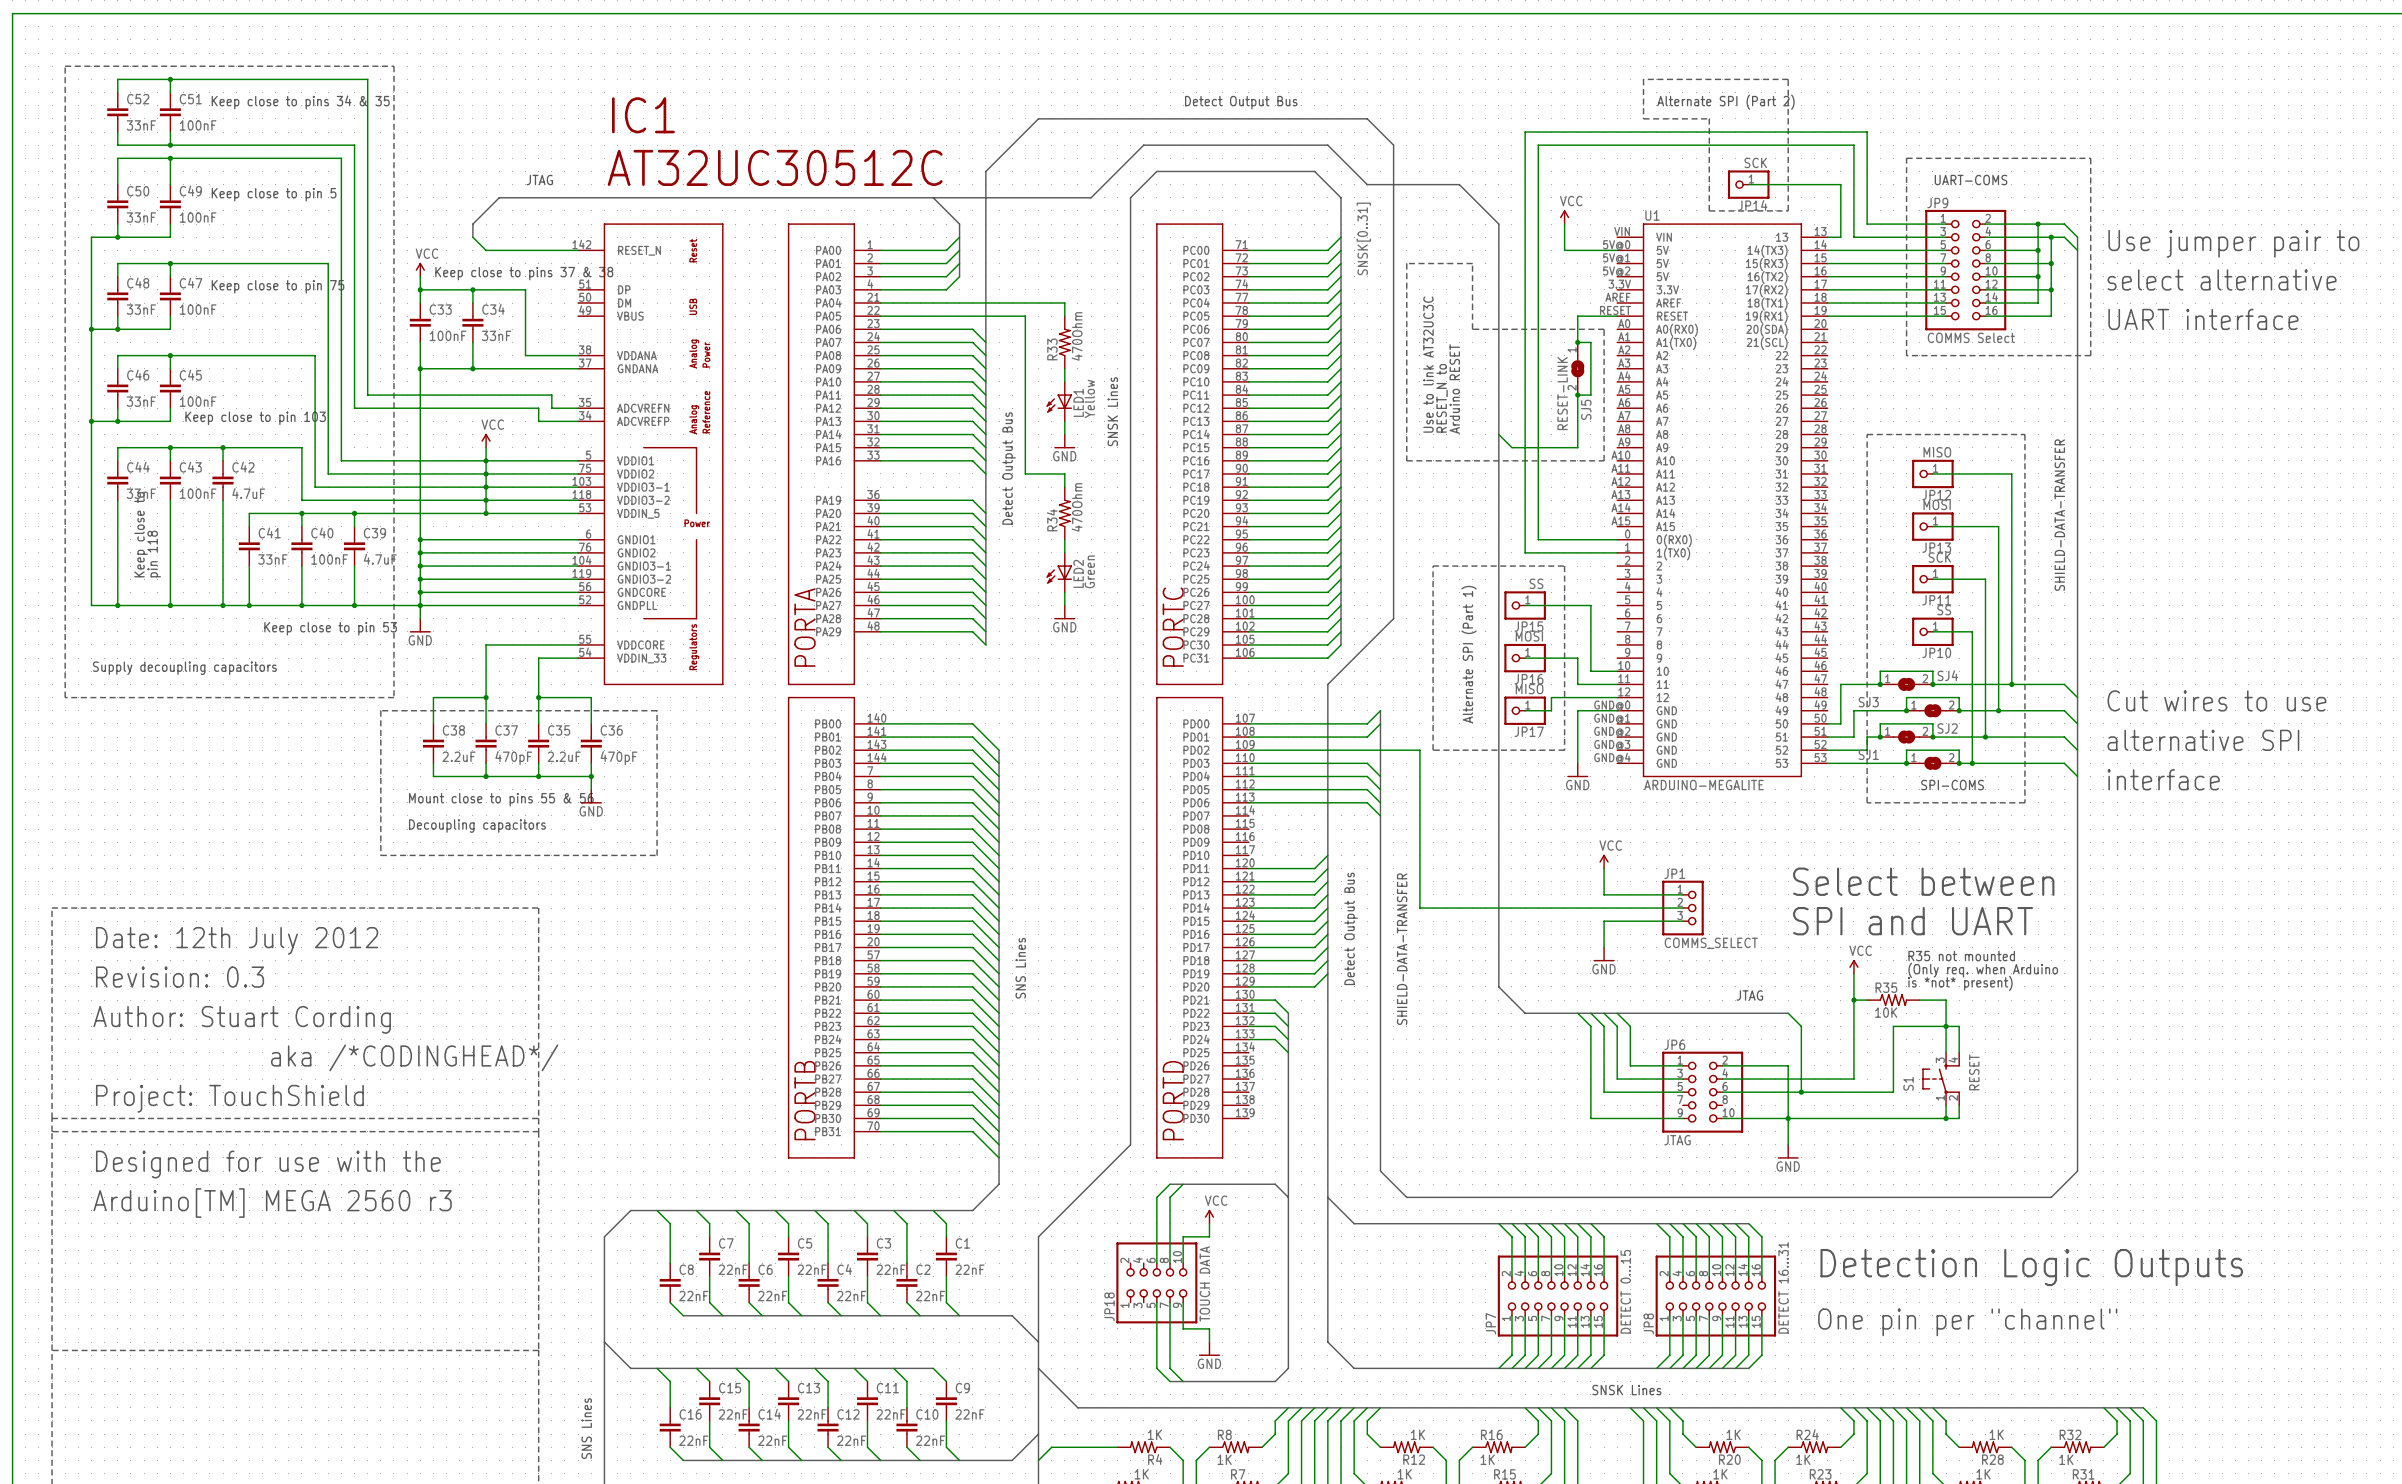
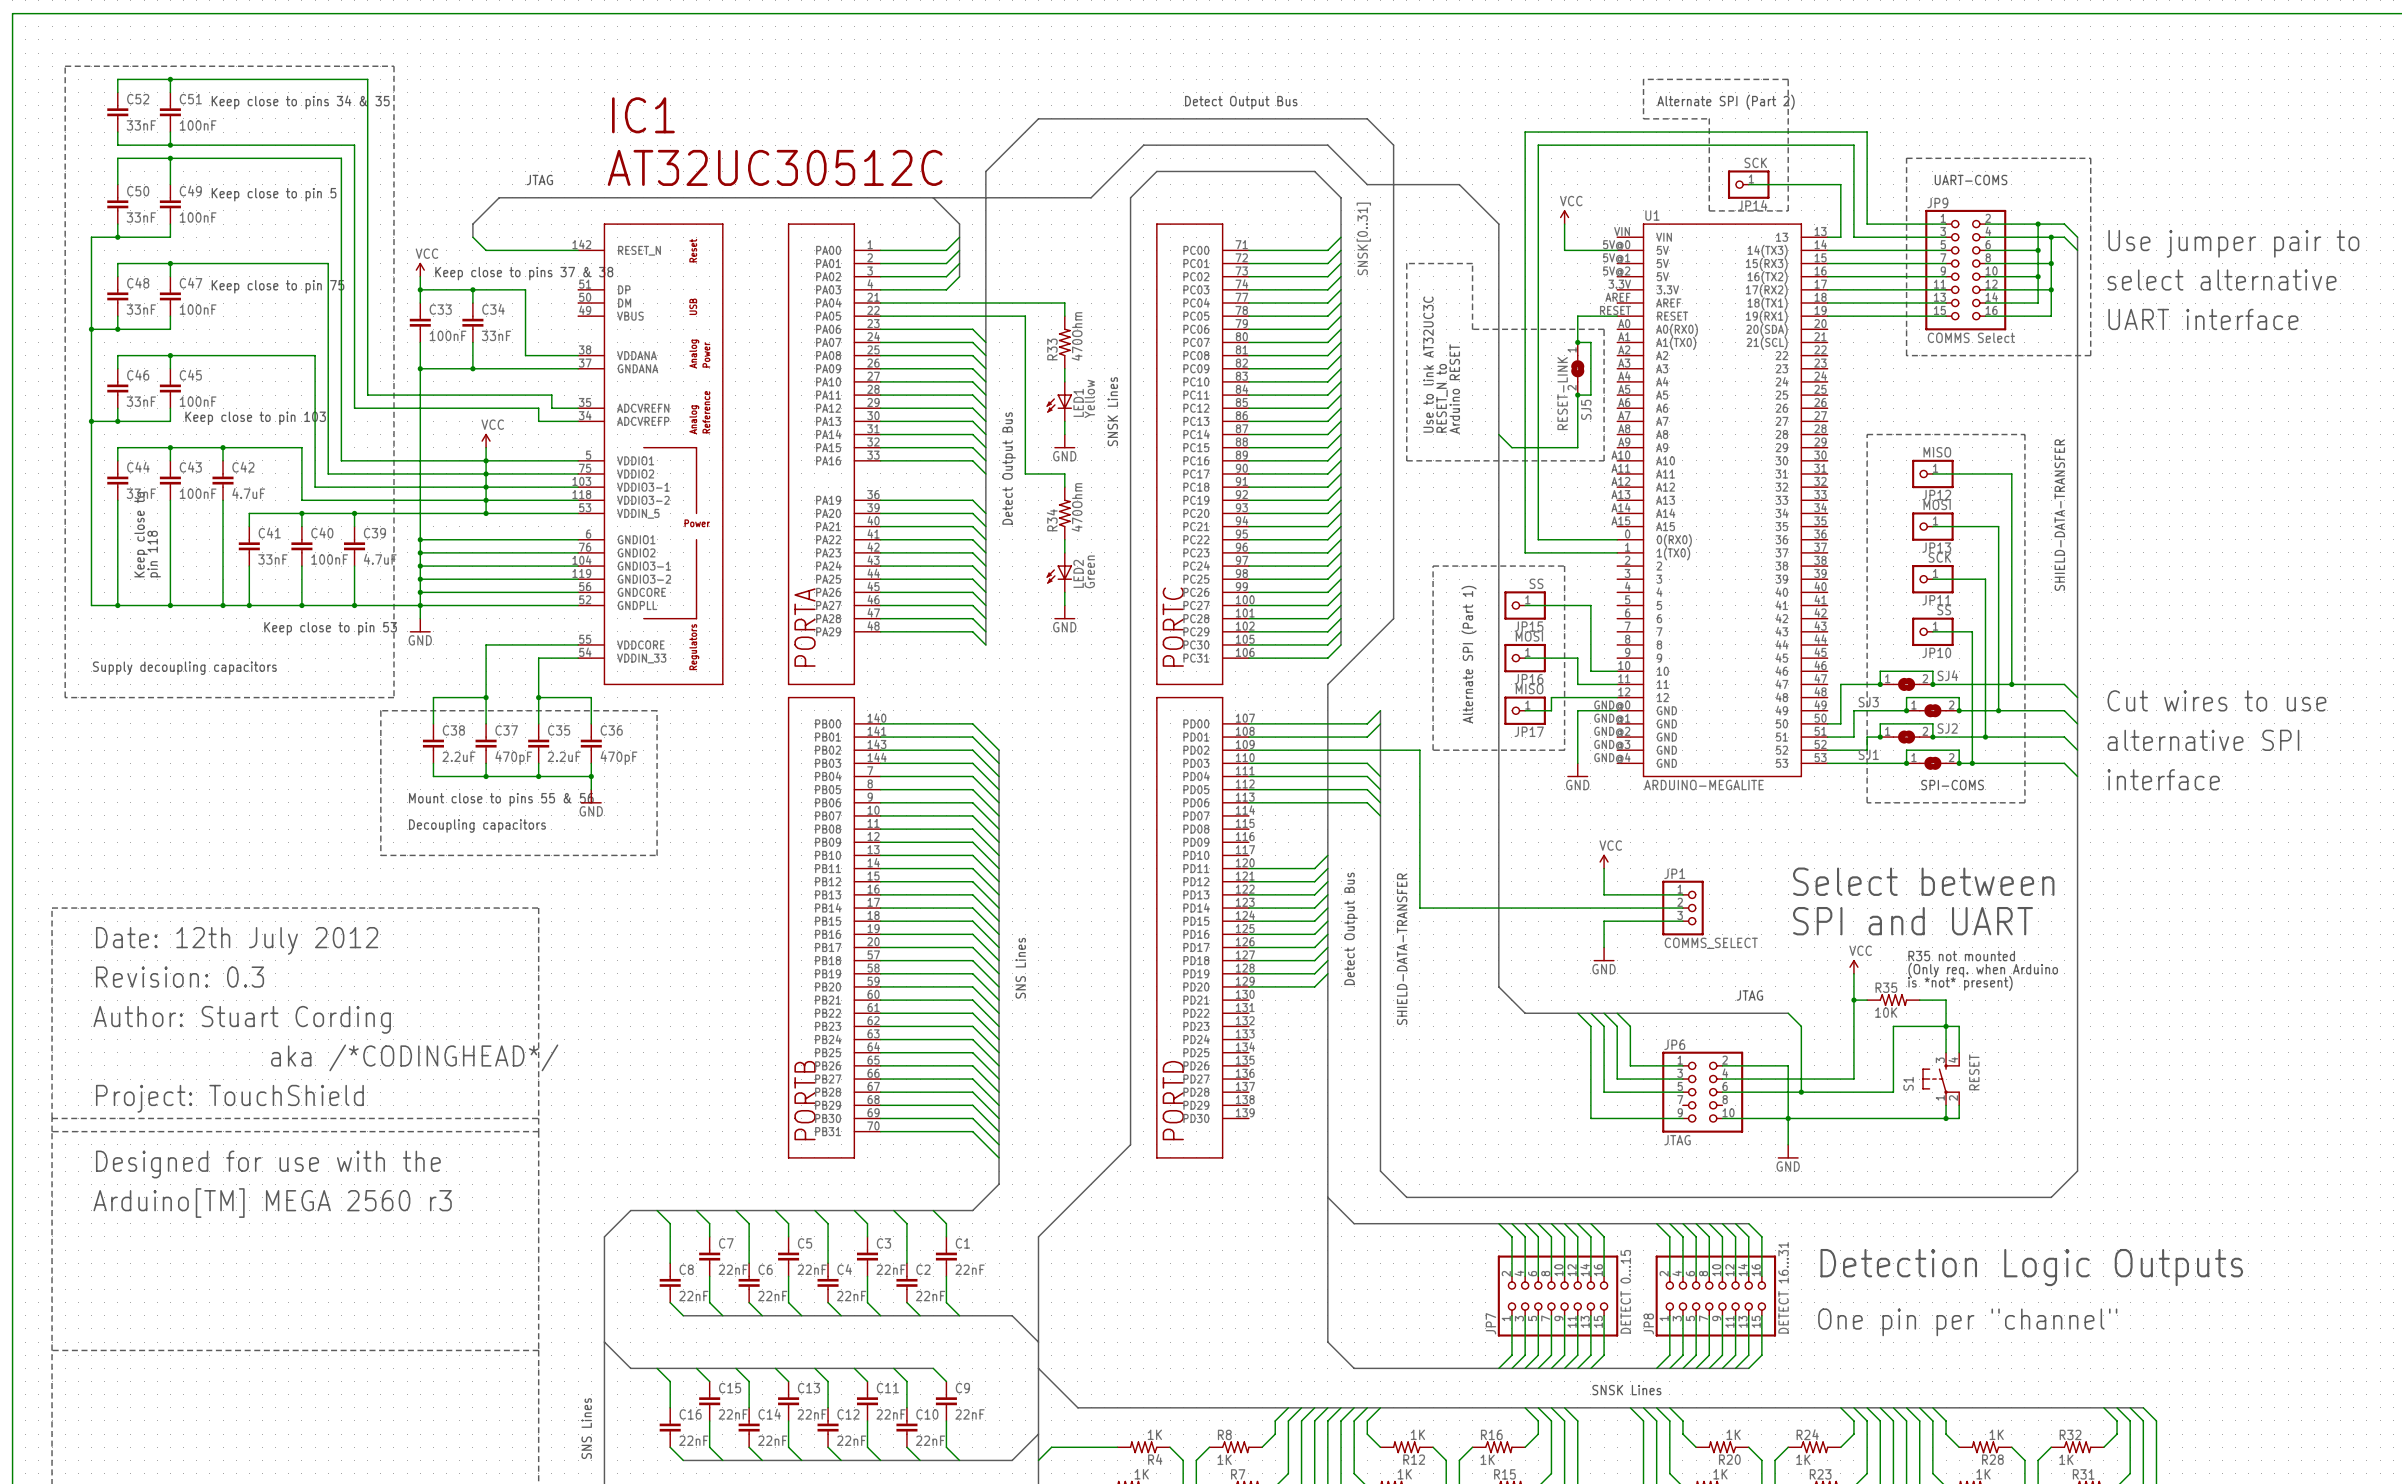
wire: (1248, 1000) (1275, 1000) (1288, 1013) -> none
wire: (1248, 1013) (1275, 1013) (1288, 1026) -> none
bus: (1288, 1013) (1288, 1368) (1275, 1381) (1170, 1381) -> none
wire: (1248, 1026) (1275, 1026) (1288, 1039) -> none
wire: (1248, 1039) (1275, 1039) (1288, 1052) -> none
bus: (1170, 1184) (1275, 1184) (1288, 1197) -> none
wire: (1170, 1184) (1156, 1197) (1156, 1263) -> none
wire: (1183, 1184) (1170, 1197) (1170, 1263) -> none
power symbol: VCC (1209, 1216) -> none
wire: (1209, 1223) (1209, 1236) (1183, 1236) (1183, 1263) -> none
JP18: TOUCH DATA (1156, 1282) -> none
wire: (1156, 1302) (1156, 1368) (1170, 1381) -> none
wire: (1170, 1302) (1170, 1368) (1183, 1381) -> none
wire: (1183, 1302) (1183, 1328) (1209, 1328) (1209, 1342) -> none
power symbol: GND (1209, 1348) -> none

